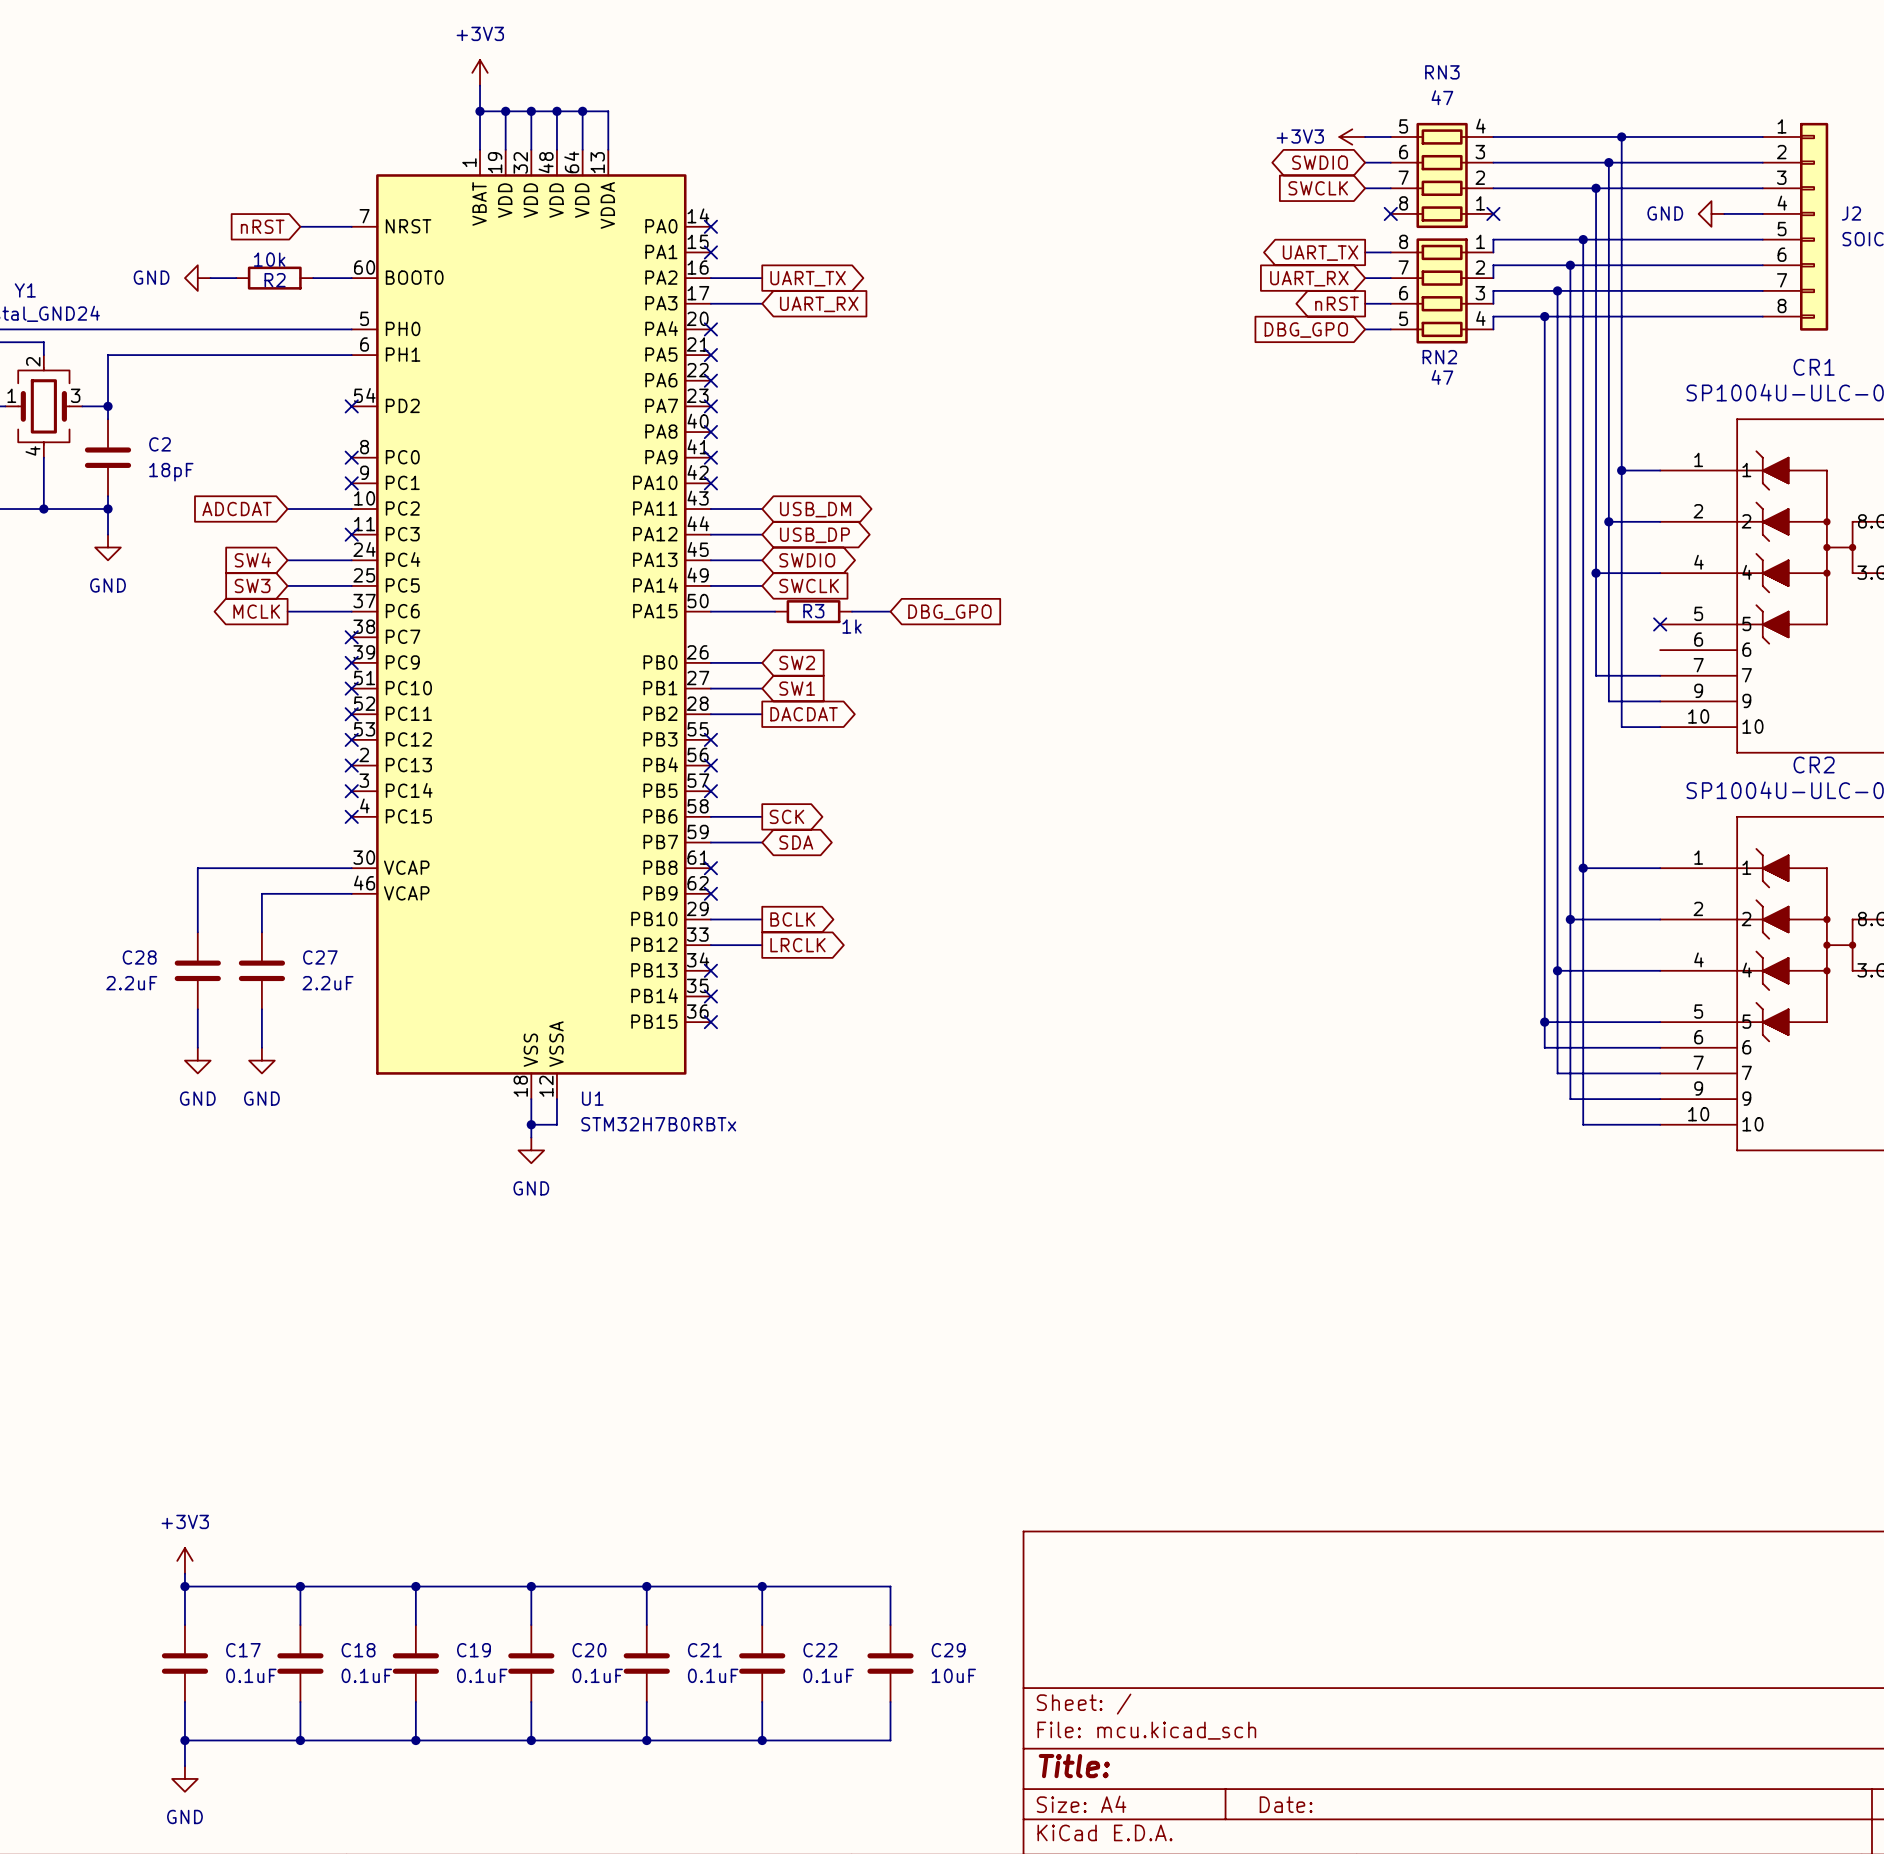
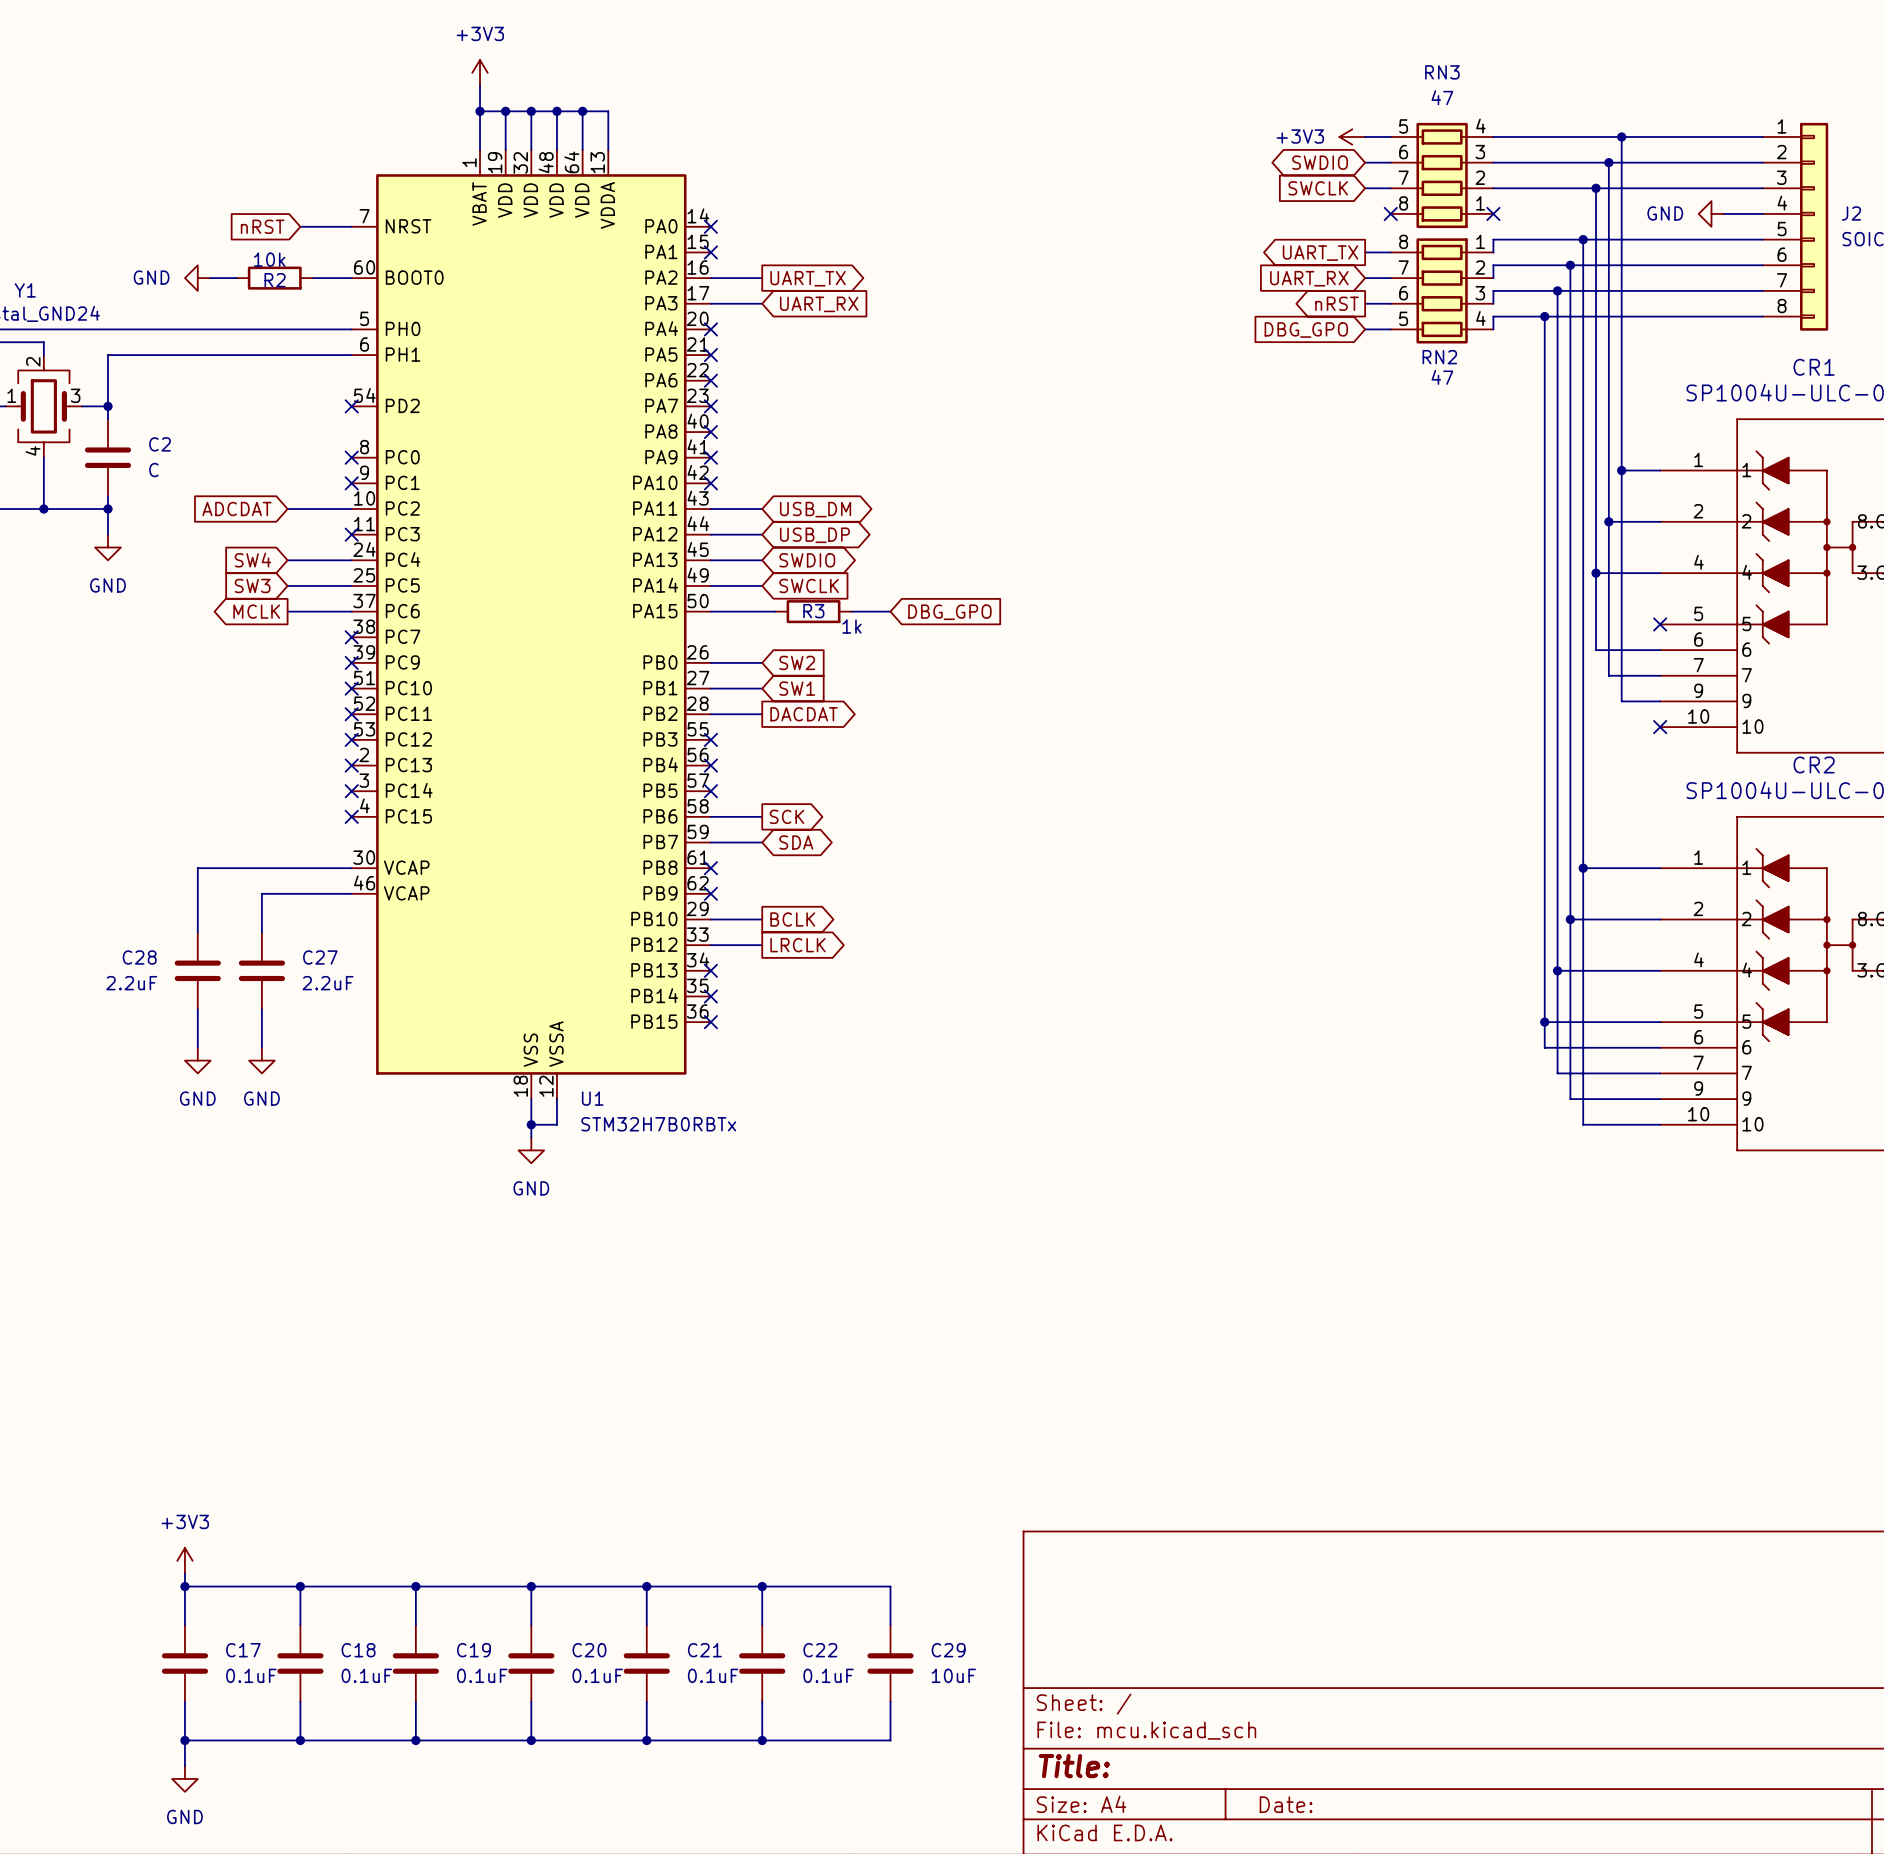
C2 value: 18pF (171, 472) -> C (153, 470)
wire: (1596, 650) (1596, 675) (1608, 675) (1608, 701) (1621, 701) (1621, 727) (1660, 727) -> (1596, 650) (1660, 650)
no-connect mark: none -> (1660, 727)

